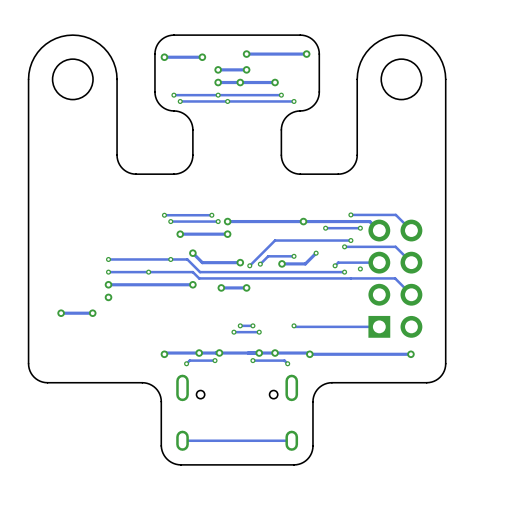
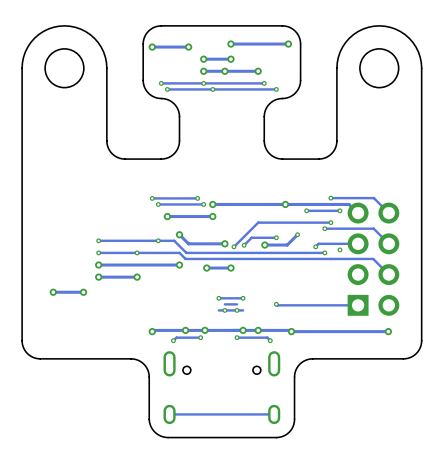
track: none -> (137, 277) (98, 277)
via: none -> (137, 277)
via: none -> (218, 298)
track: none -> (243, 298) (218, 298)
via: none -> (243, 298)
via: (240, 325) -> none
via: (252, 325) -> none
via: (233, 332) -> none
via: none -> (224, 310)
via: none -> (237, 310)
via: (259, 332) -> none

